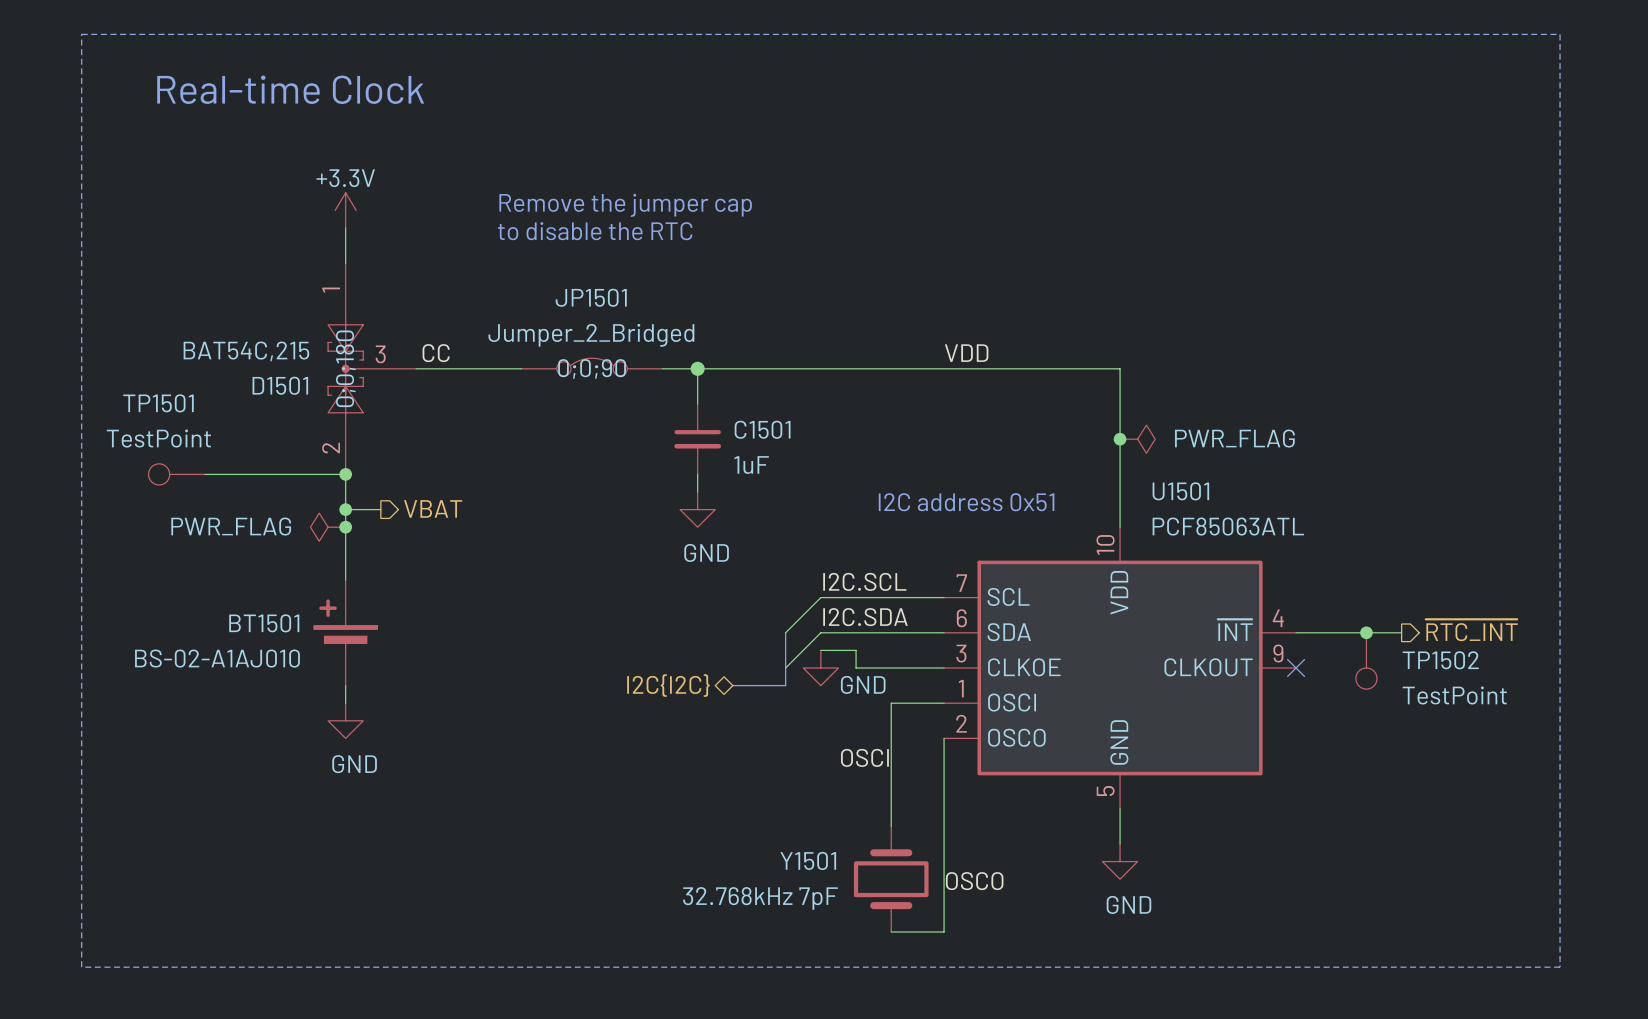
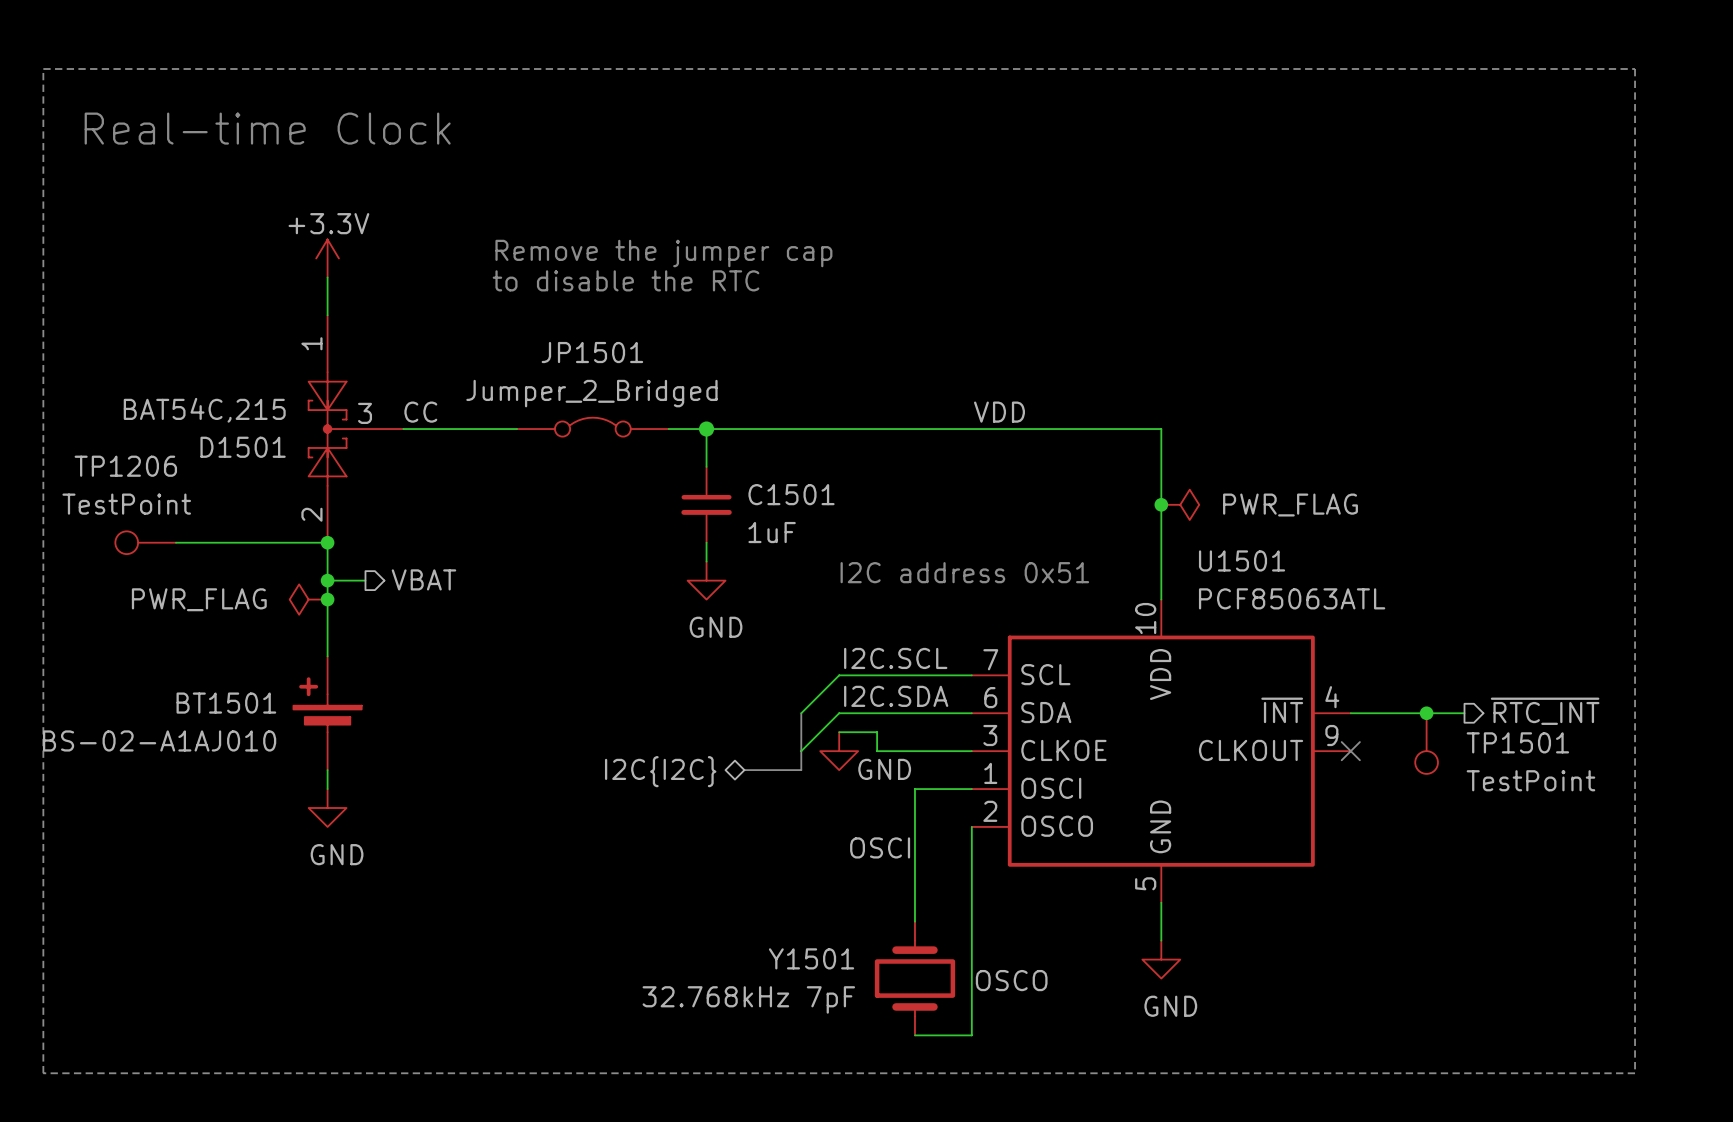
D1501 text: 0;0;180 (345, 368) -> none
JP1501 text: 0;0;90 (592, 368) -> none
TP1501 name: TP1501 (158, 403) -> TP1206 (125, 466)
TP1502 name: TP1502 (1440, 660) -> TP1501 (1517, 742)

